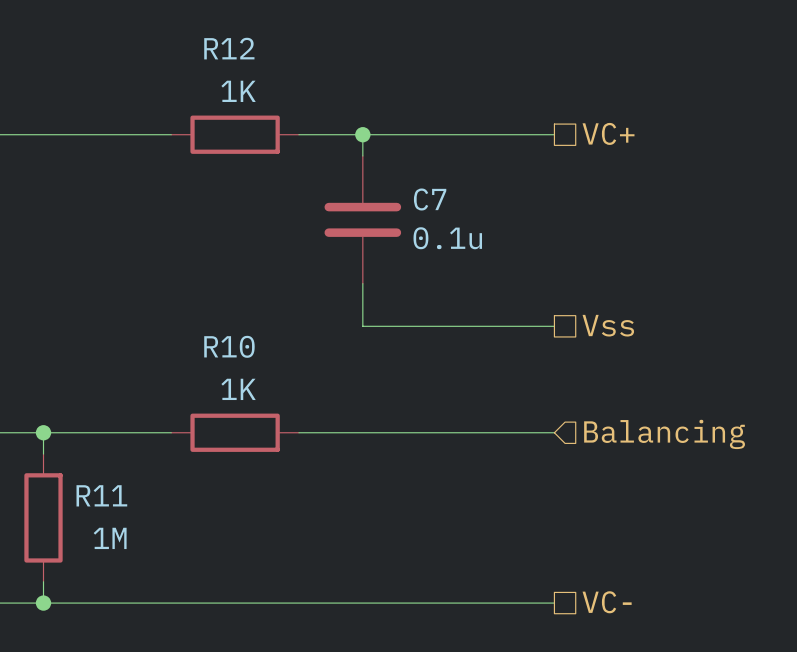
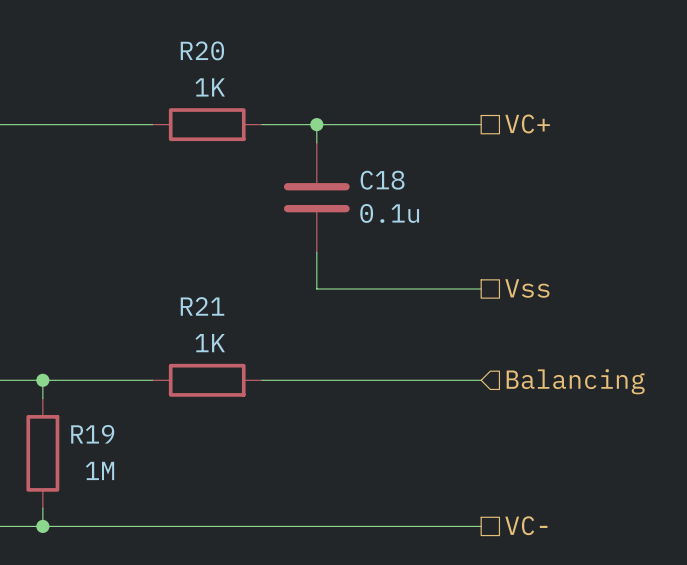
R12 name: R12 (229, 48) -> R20 (202, 50)
C7 name: C7 (430, 199) -> C18 (382, 180)
R10 name: R10 (229, 346) -> R21 (202, 306)
R11 name: R11 (101, 495) -> R19 (92, 434)

